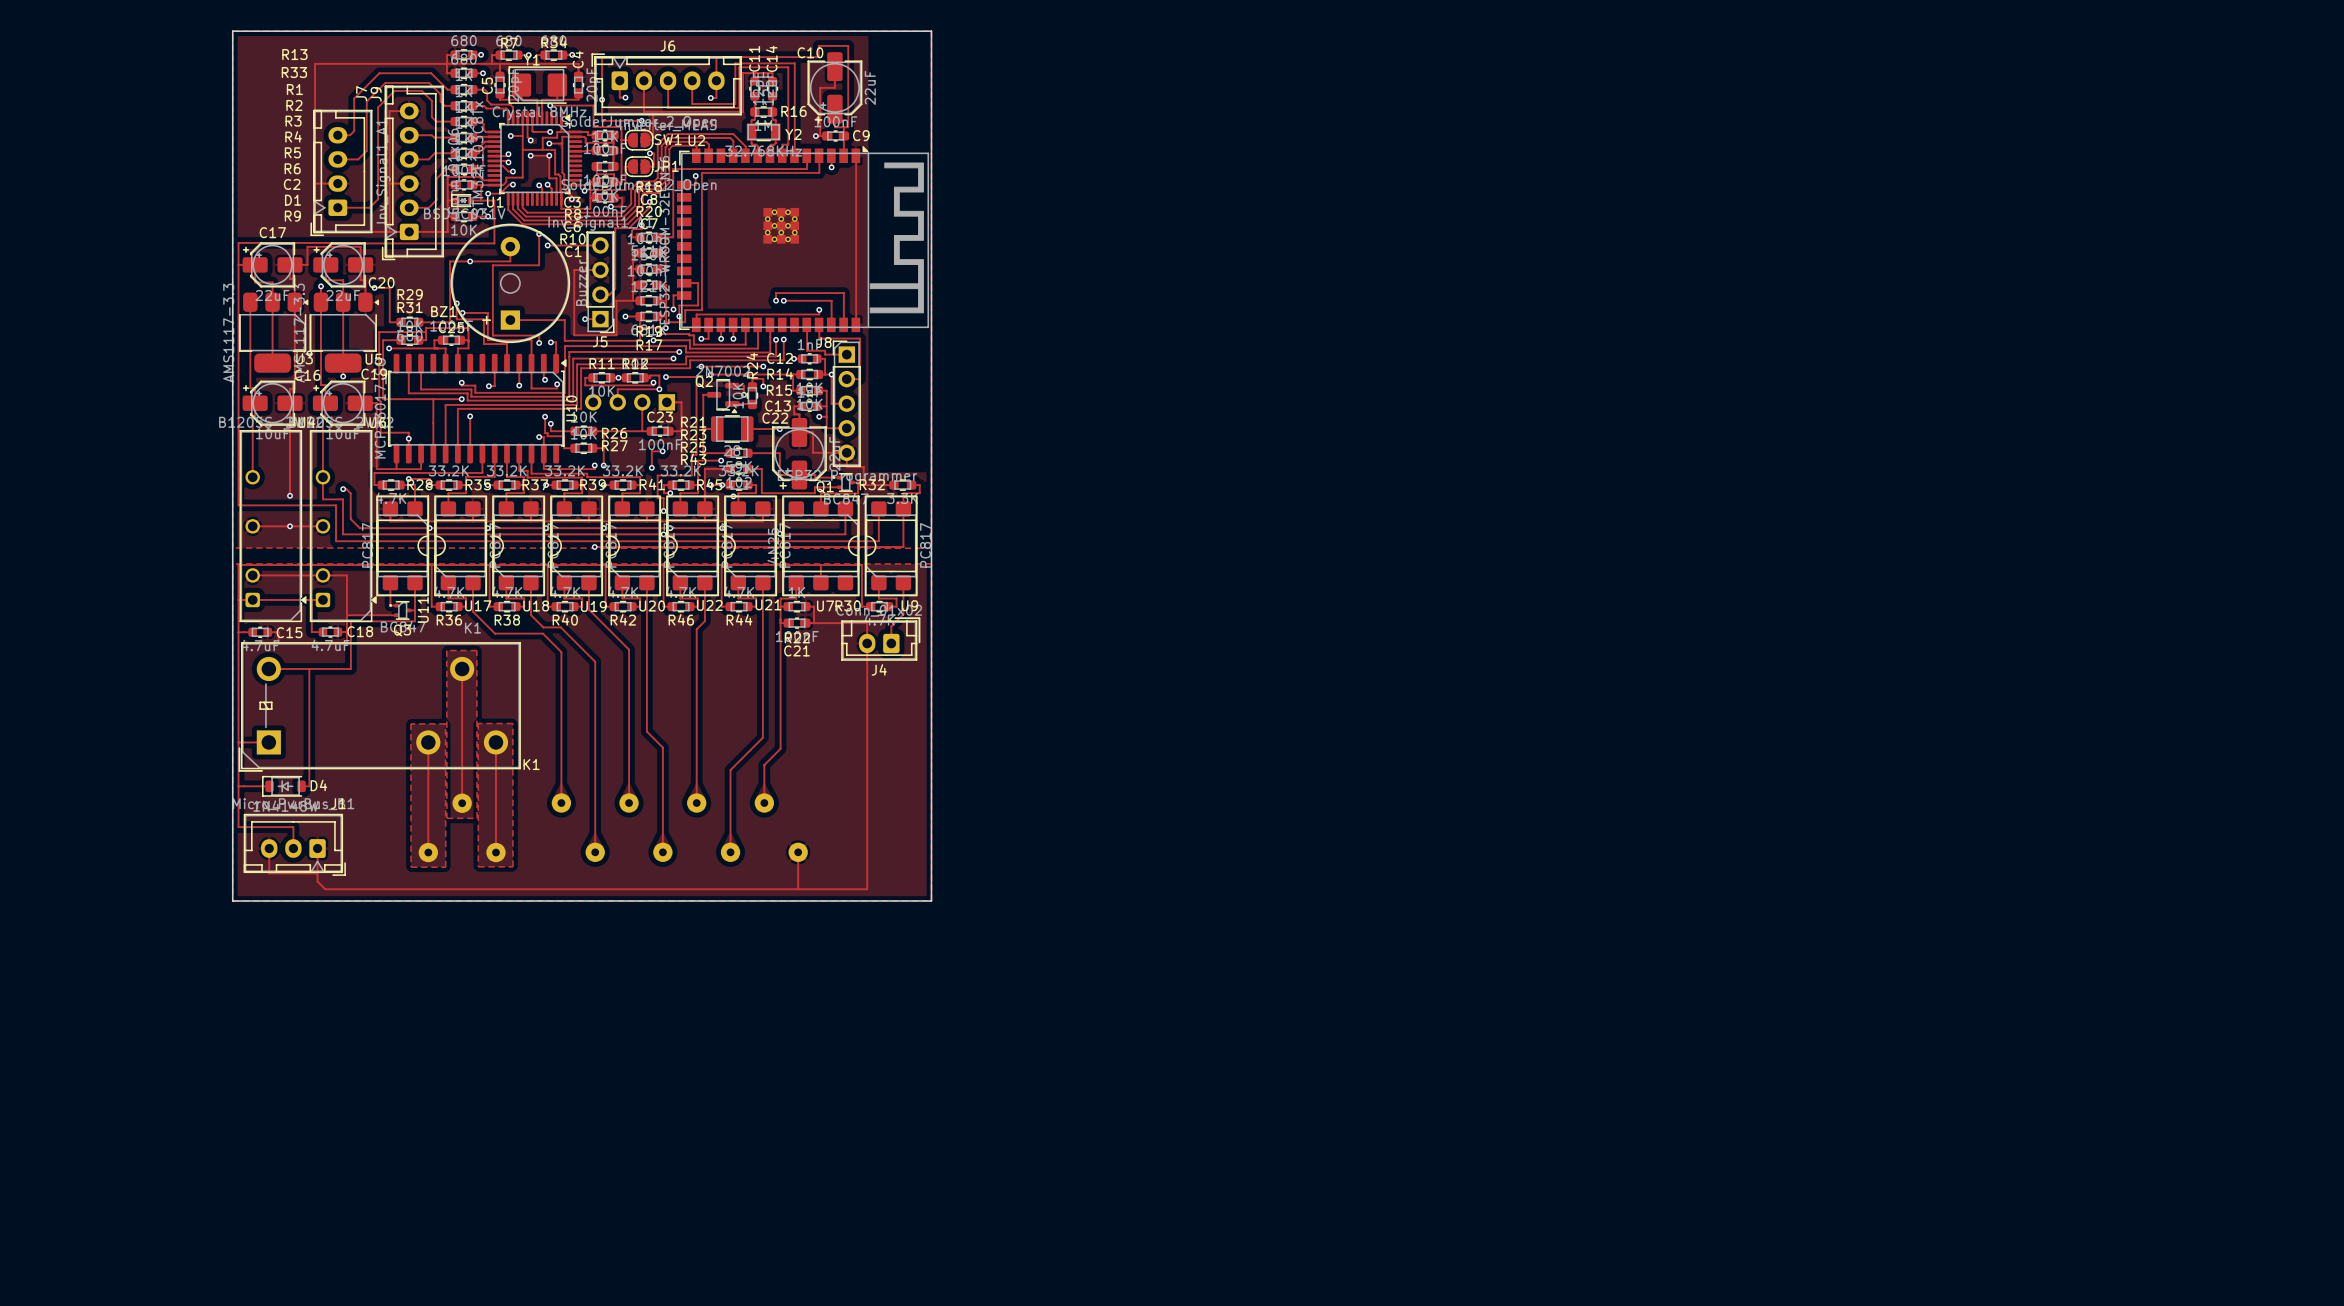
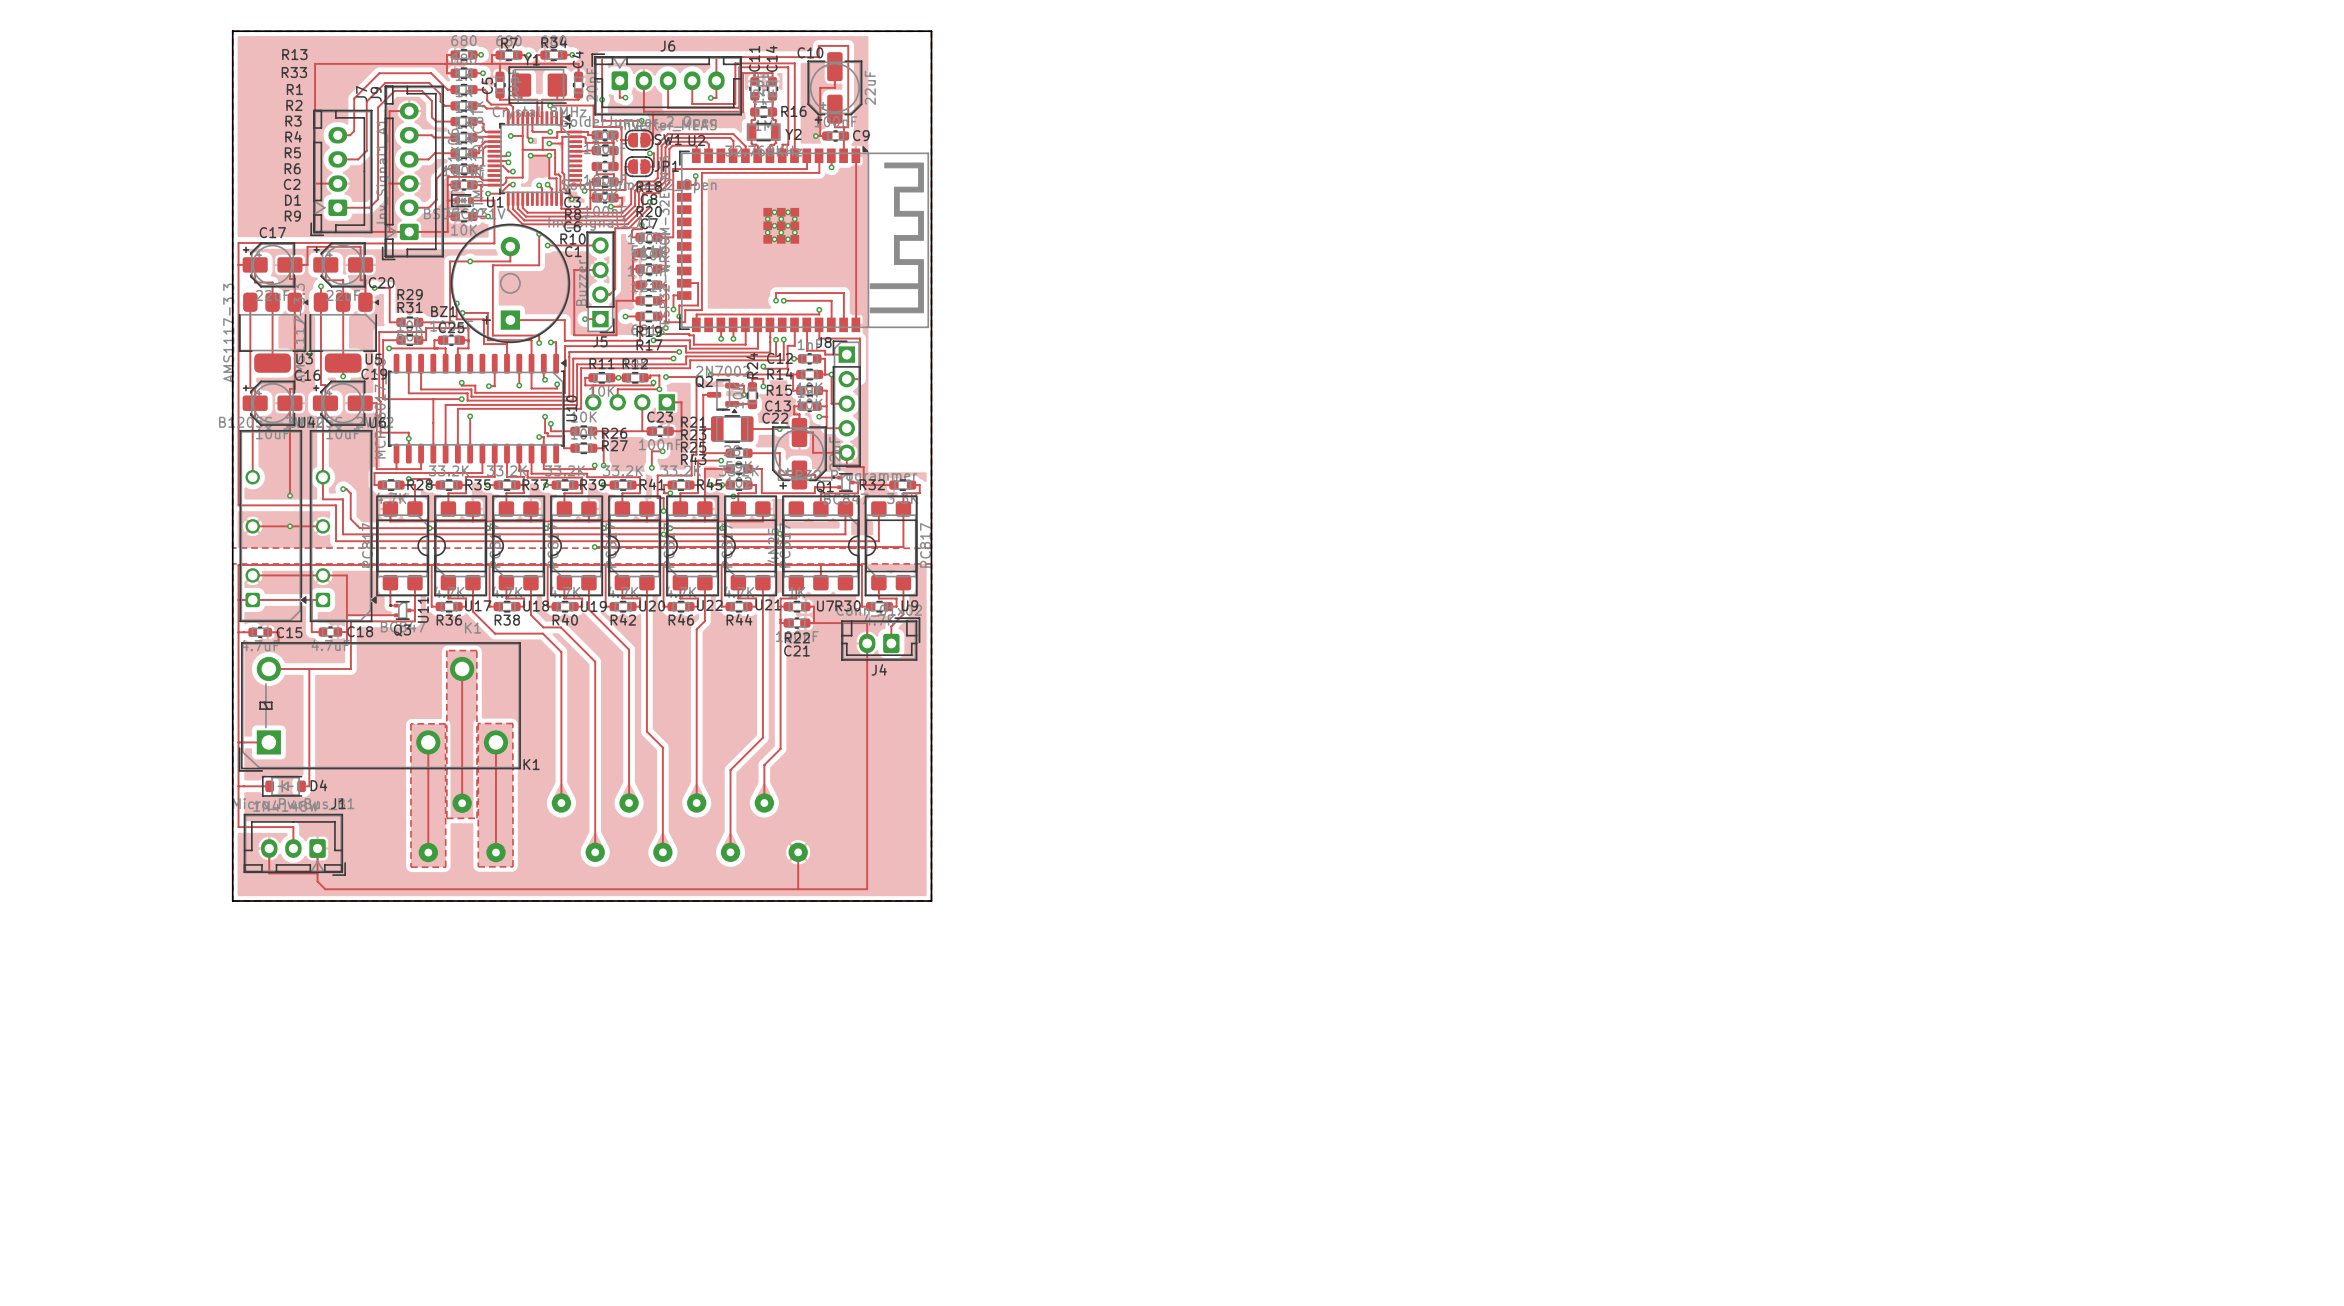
track: (708, 324) (708, 338) (701, 338) -> none
track: none -> (794, 324) (794, 345) (787, 345) (787, 368) (763, 368)
via: (701, 338) -> none
track: (701, 366) (763, 366) -> none
via: (701, 366) -> none

